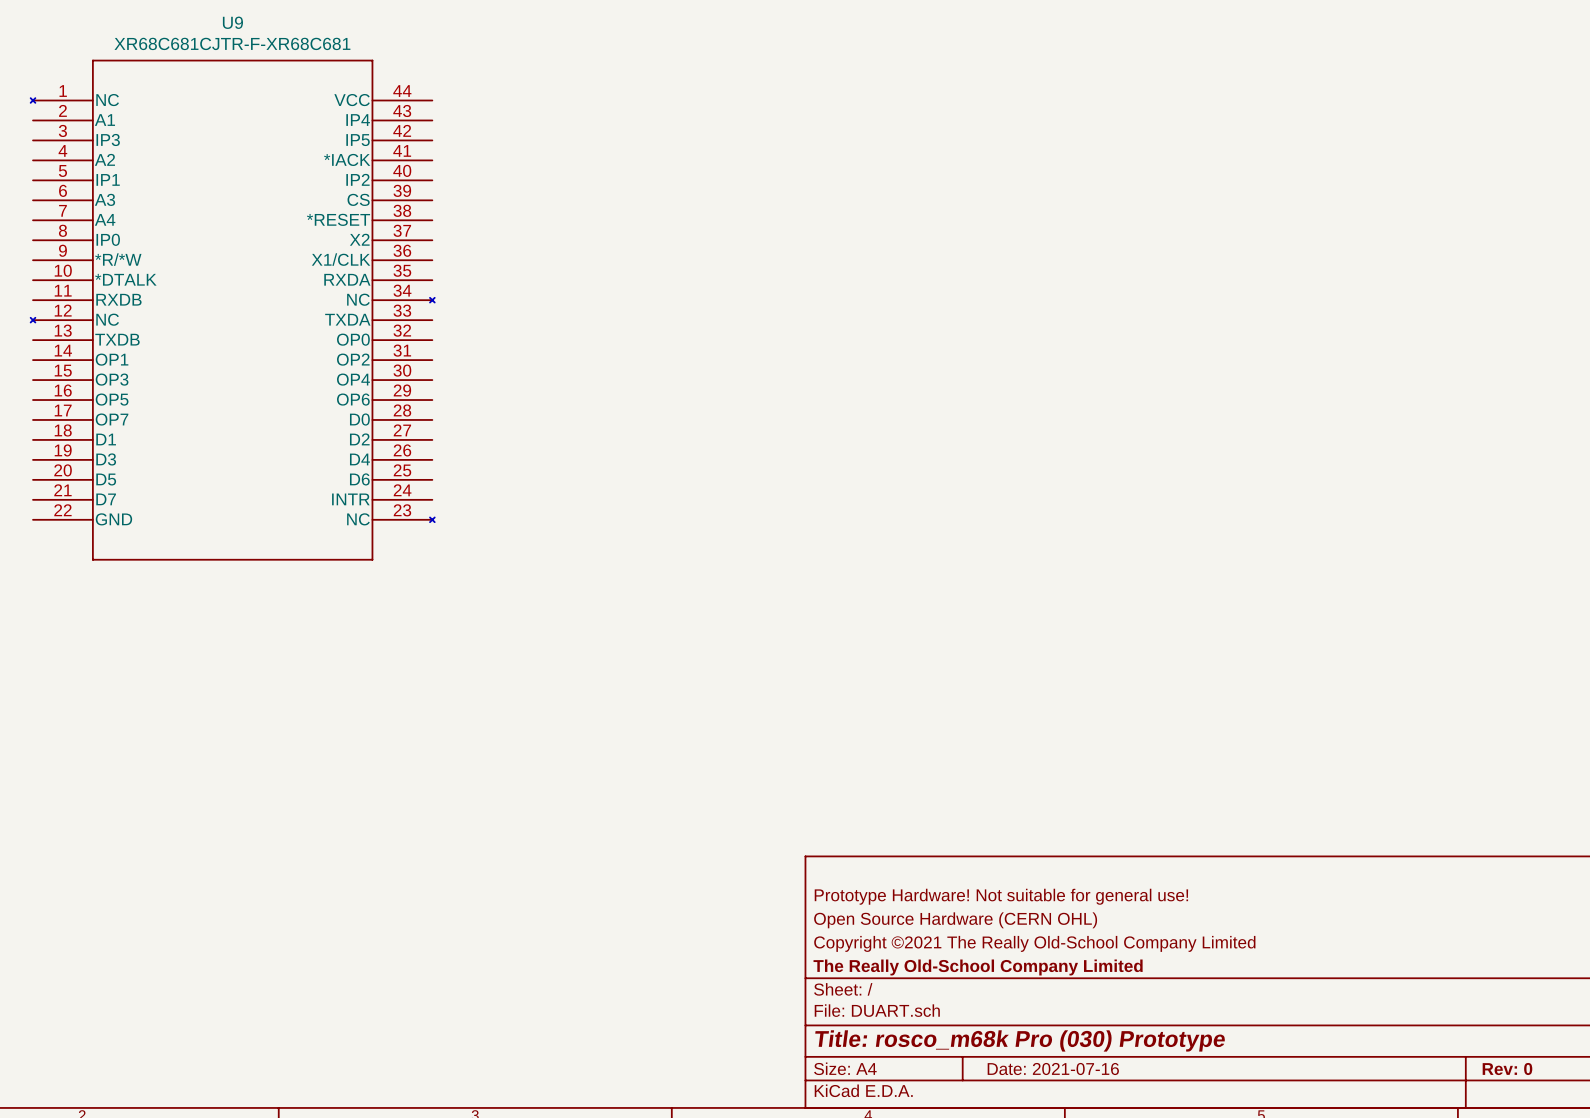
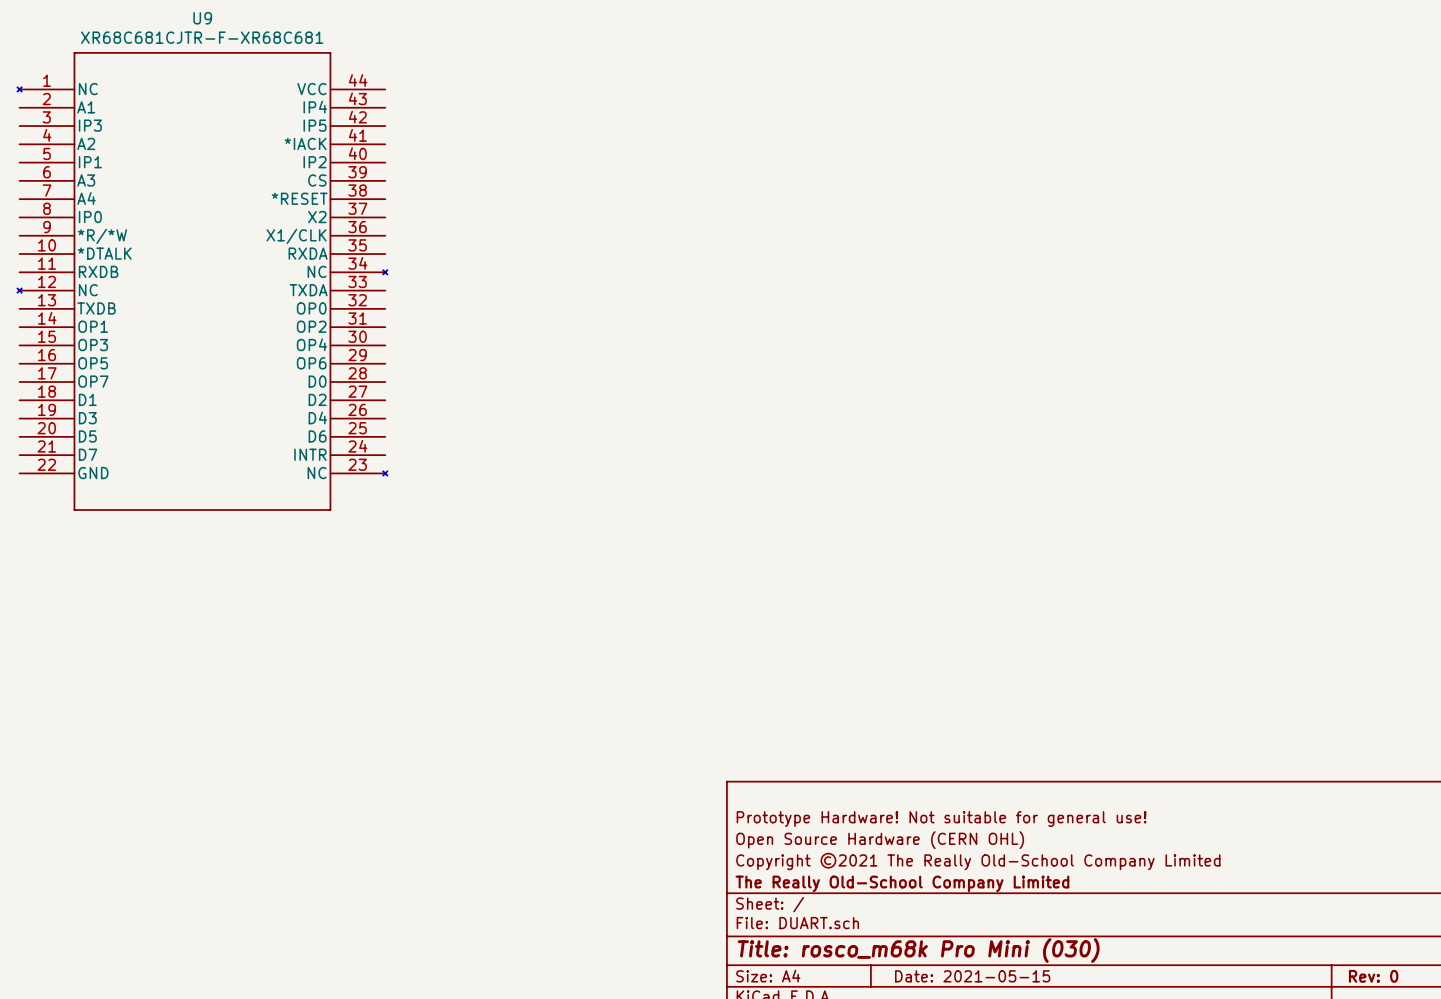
title block: Title: rosco_m68k Pro (030) Prototype (1020, 1040) -> Title: rosco_m68k Pro Mini (030) (918, 950)
title block: Date: 2021-07-16 (1053, 1069) -> Date: 2021-05-15 (972, 976)

